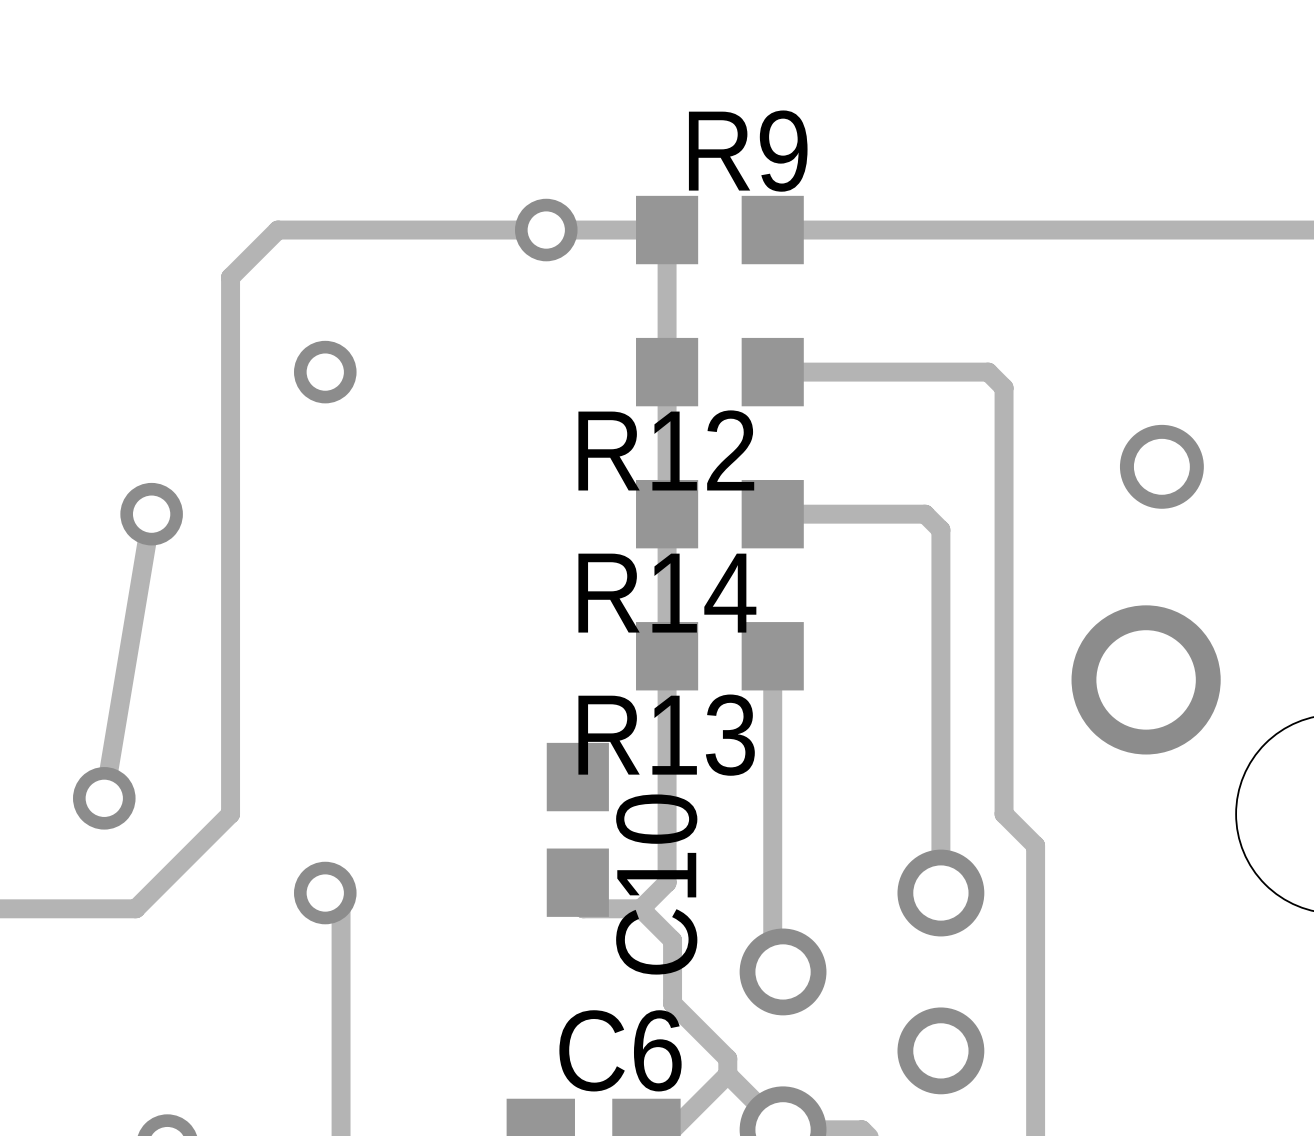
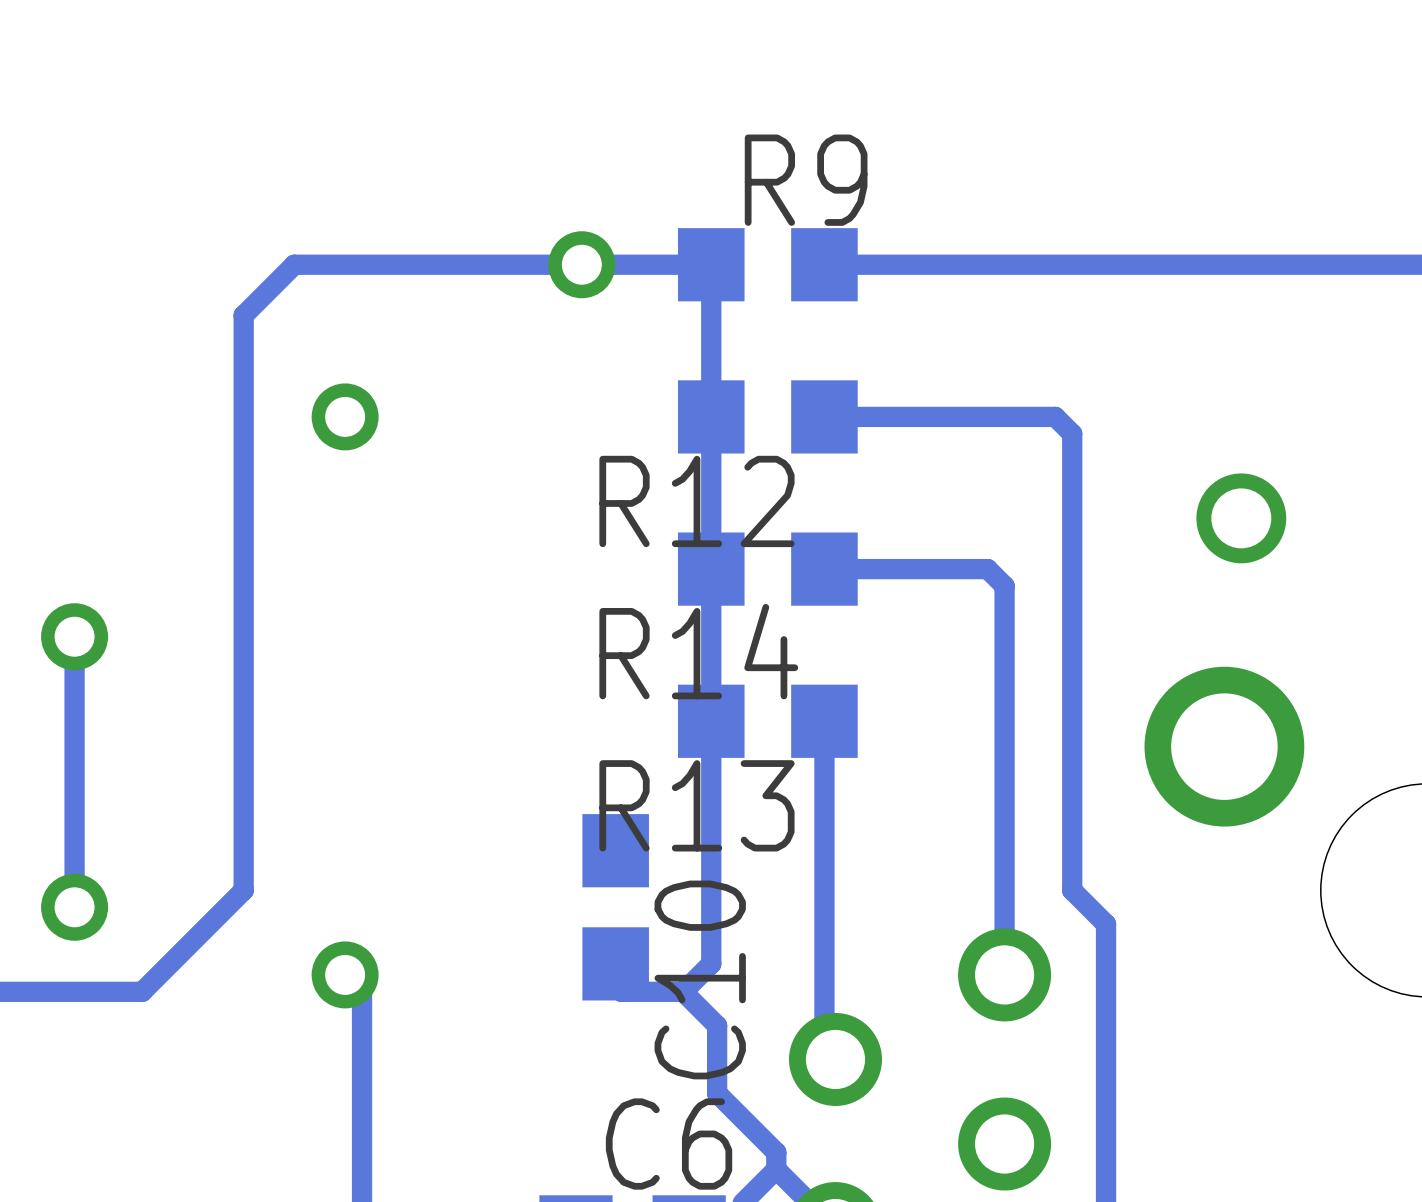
track: (151, 514) (104, 798) -> none
via position: (151, 514) -> (74, 636)
track: none -> (74, 636) (74, 907)
via position: (104, 798) -> (74, 907)

